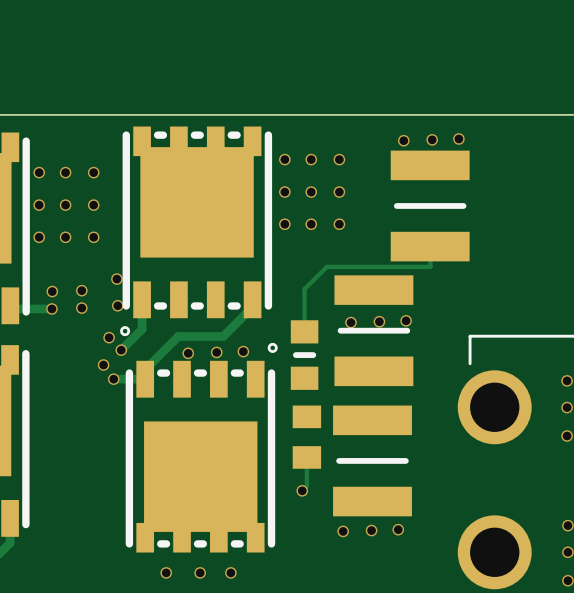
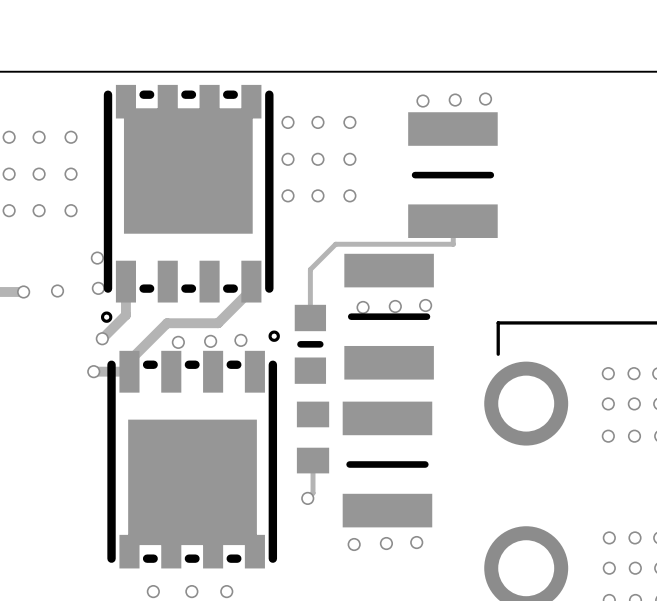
via: (81, 290) -> none
via: (52, 291) -> none
via: (109, 337) -> none
via: (103, 365) -> none

